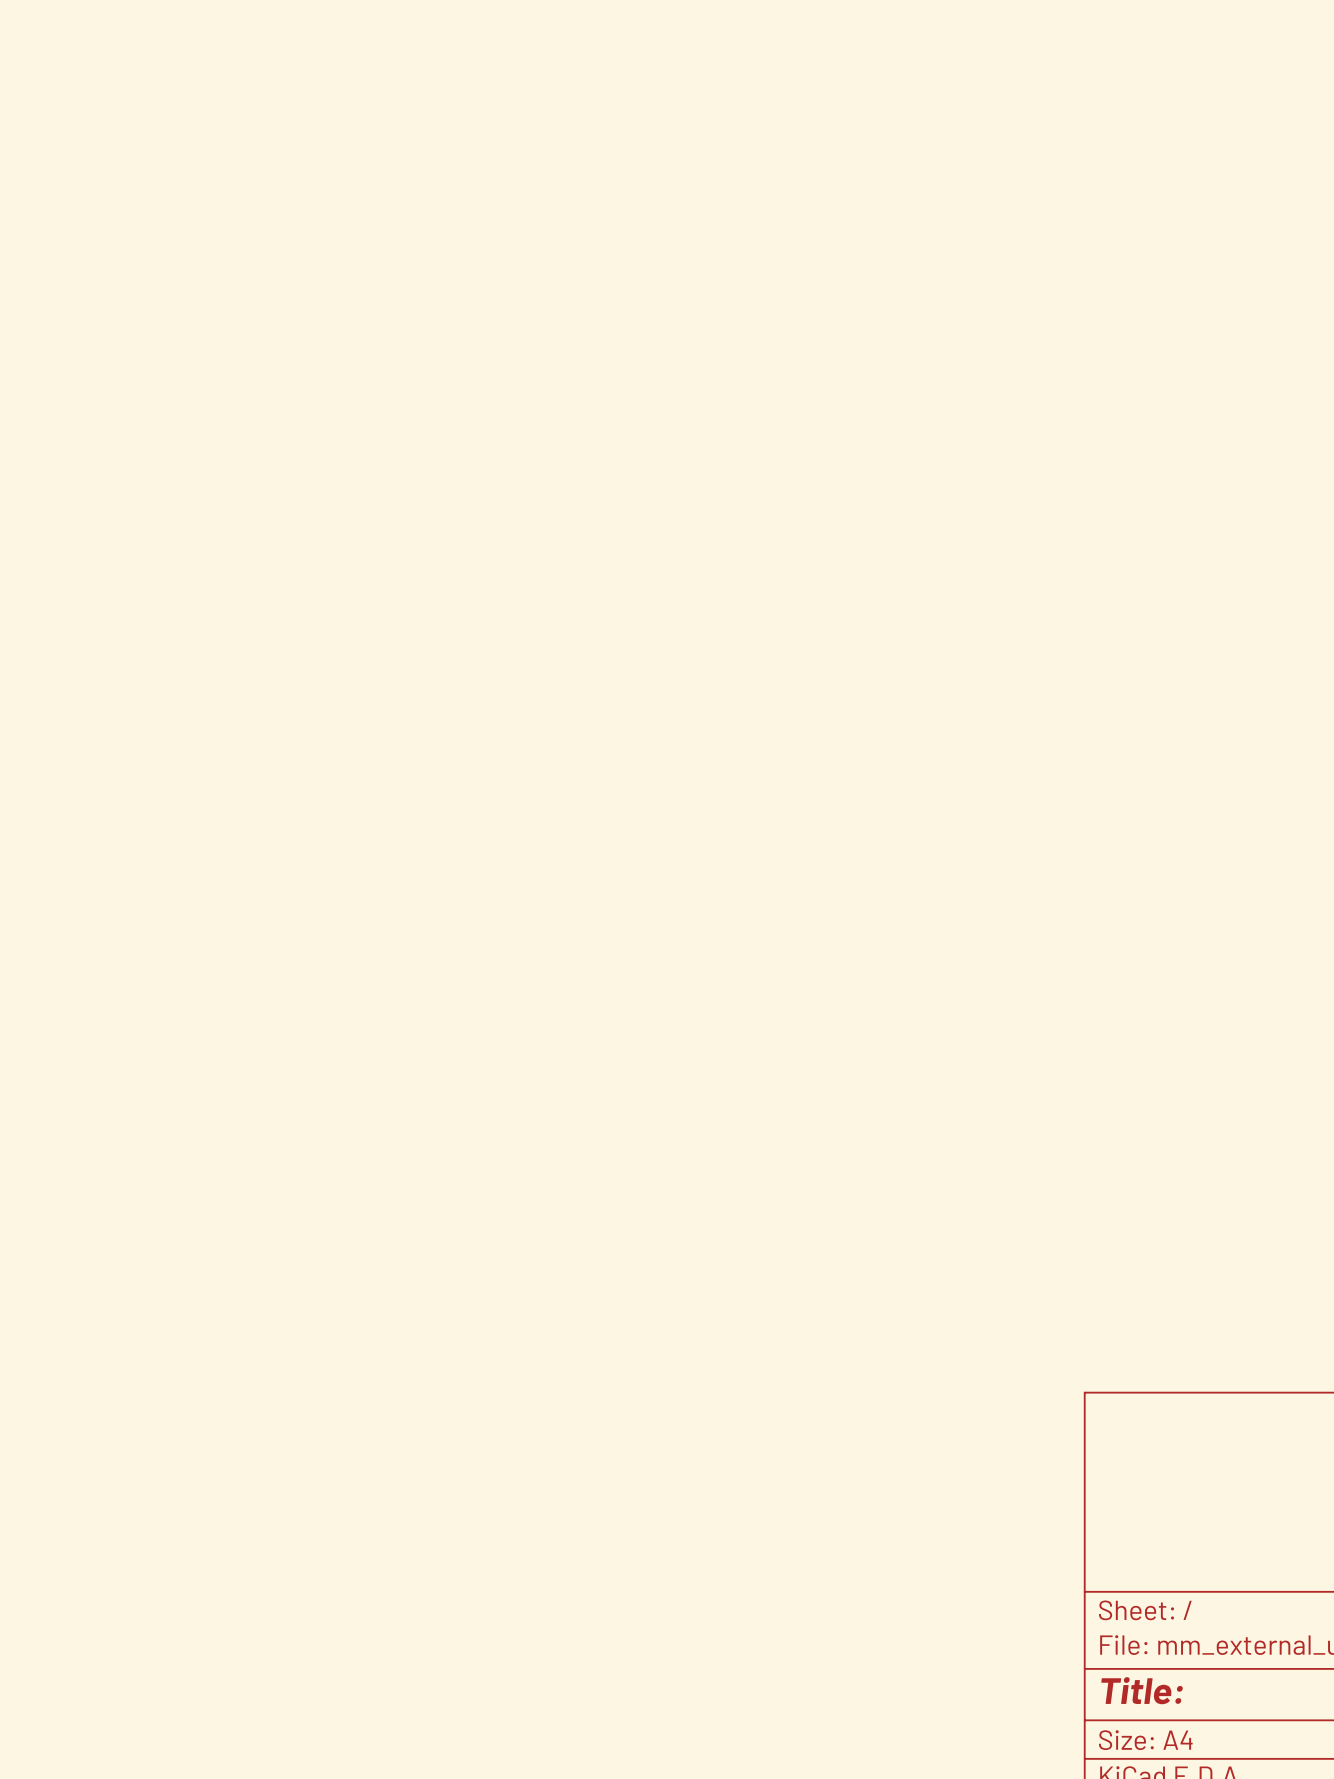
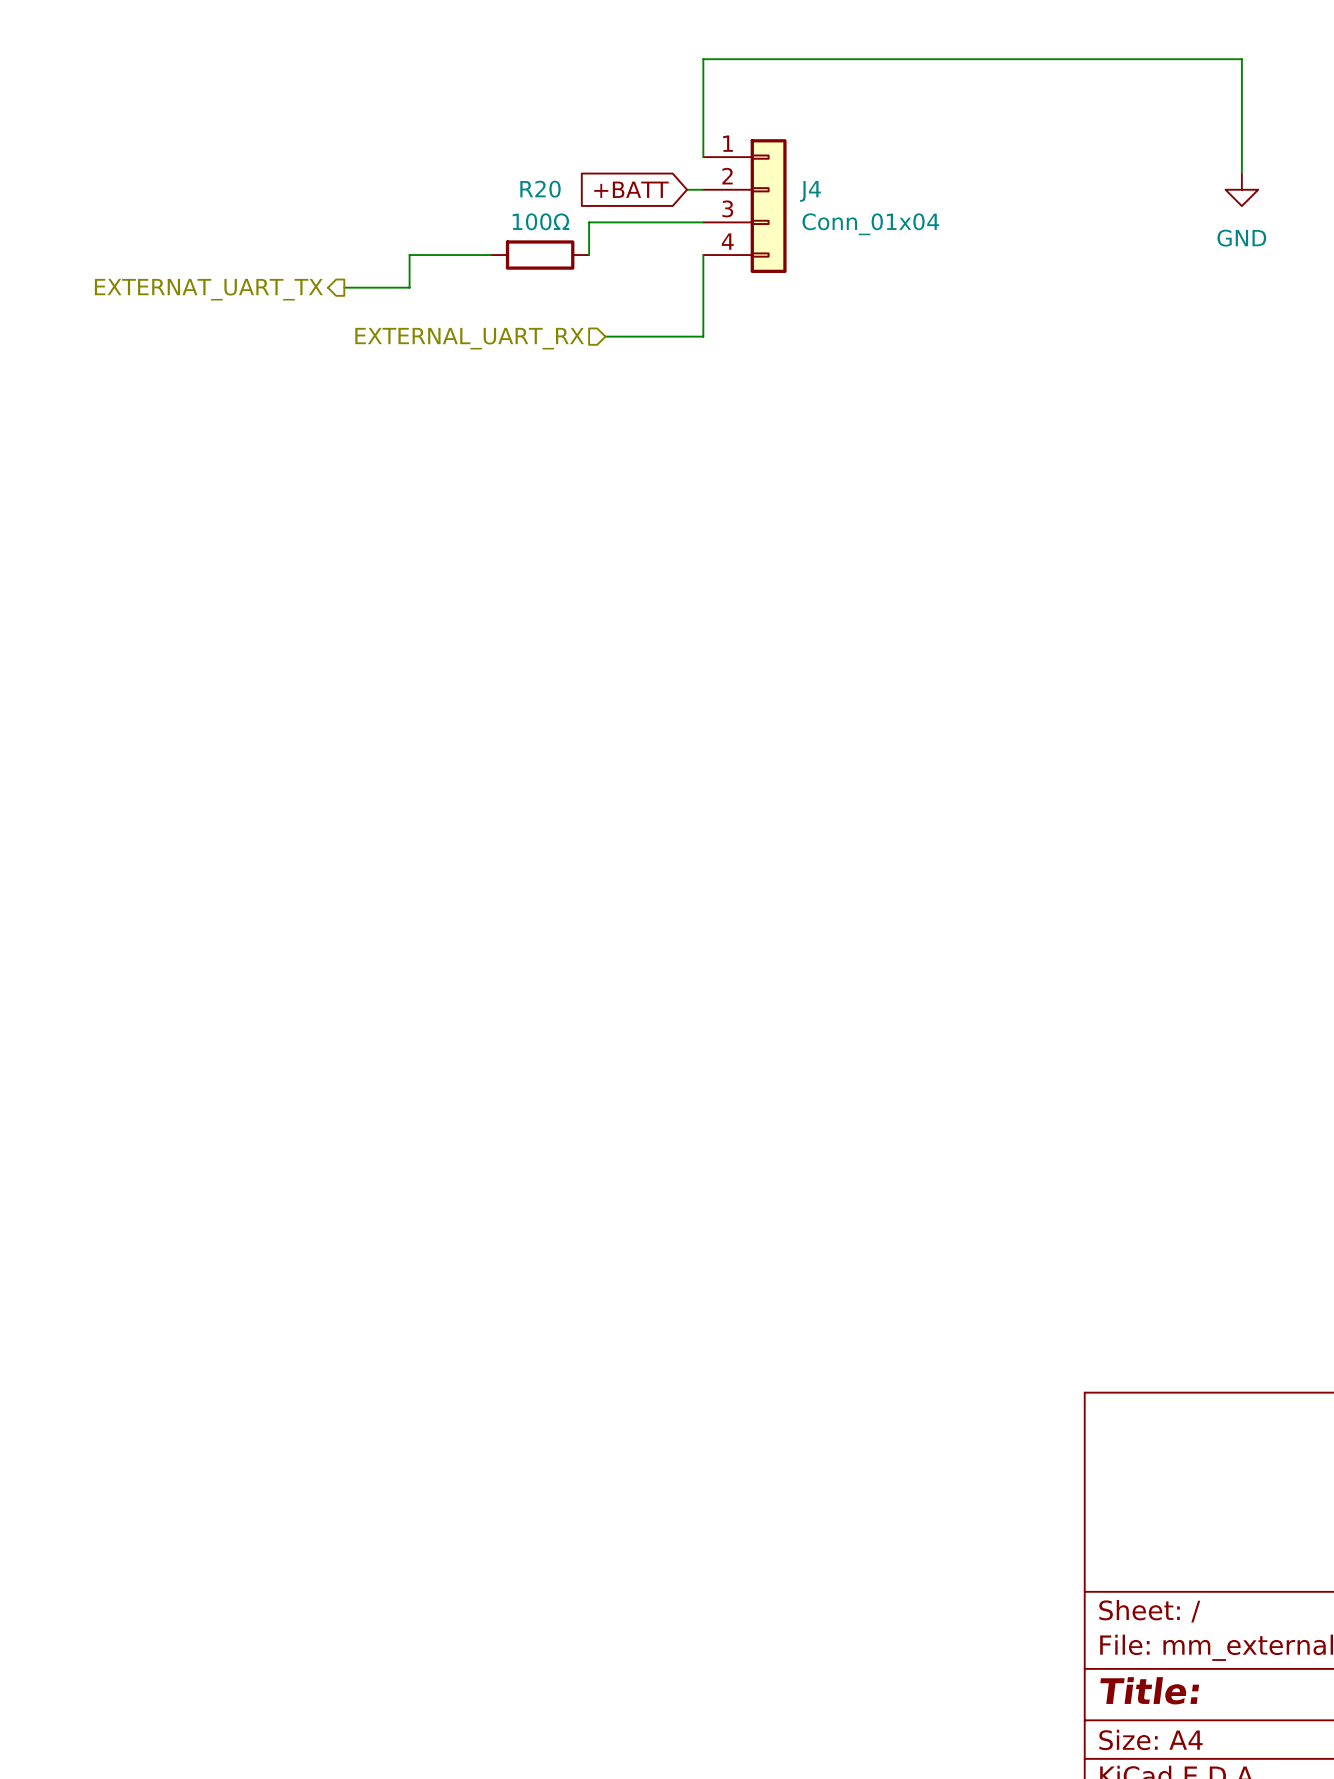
wire: none -> (703, 157) (703, 59) (1241, 59) (1241, 173)
global label: none -> +BATT (631, 189)
wire: none -> (687, 189) (703, 189)
power symbol: none -> GND (1241, 189)
J4: none -> Conn_01x04 (744, 206)
wire: none -> (703, 222) (589, 222) (589, 255)
wire: none -> (491, 255) (409, 255) (409, 287) (344, 287)
R20: none -> 100Ω (540, 255)
wire: none -> (703, 255) (703, 336) (605, 336)
hierarchical label: none -> EXTERNAT_UART_TX (208, 289)
hierarchical label: none -> EXTERNAL_UART_RX (469, 338)

